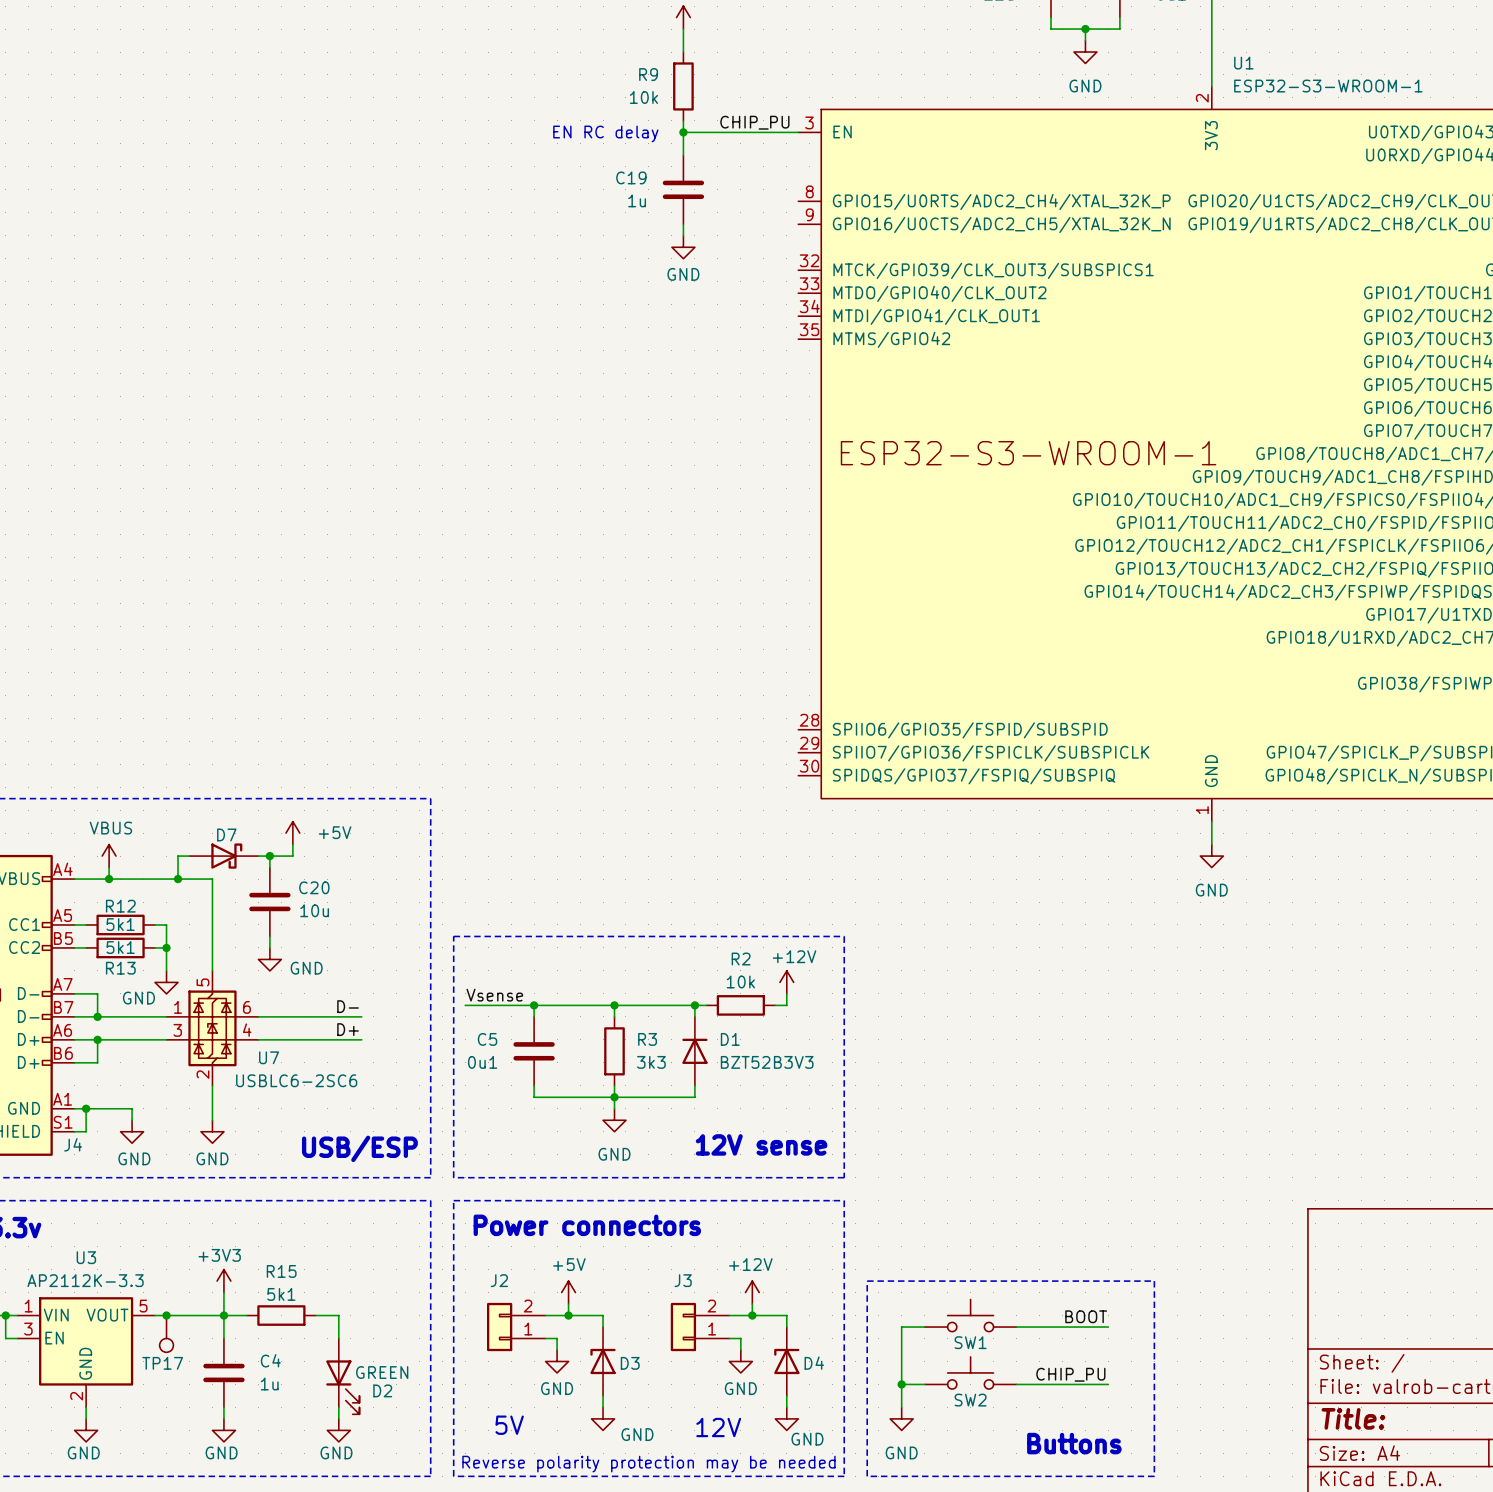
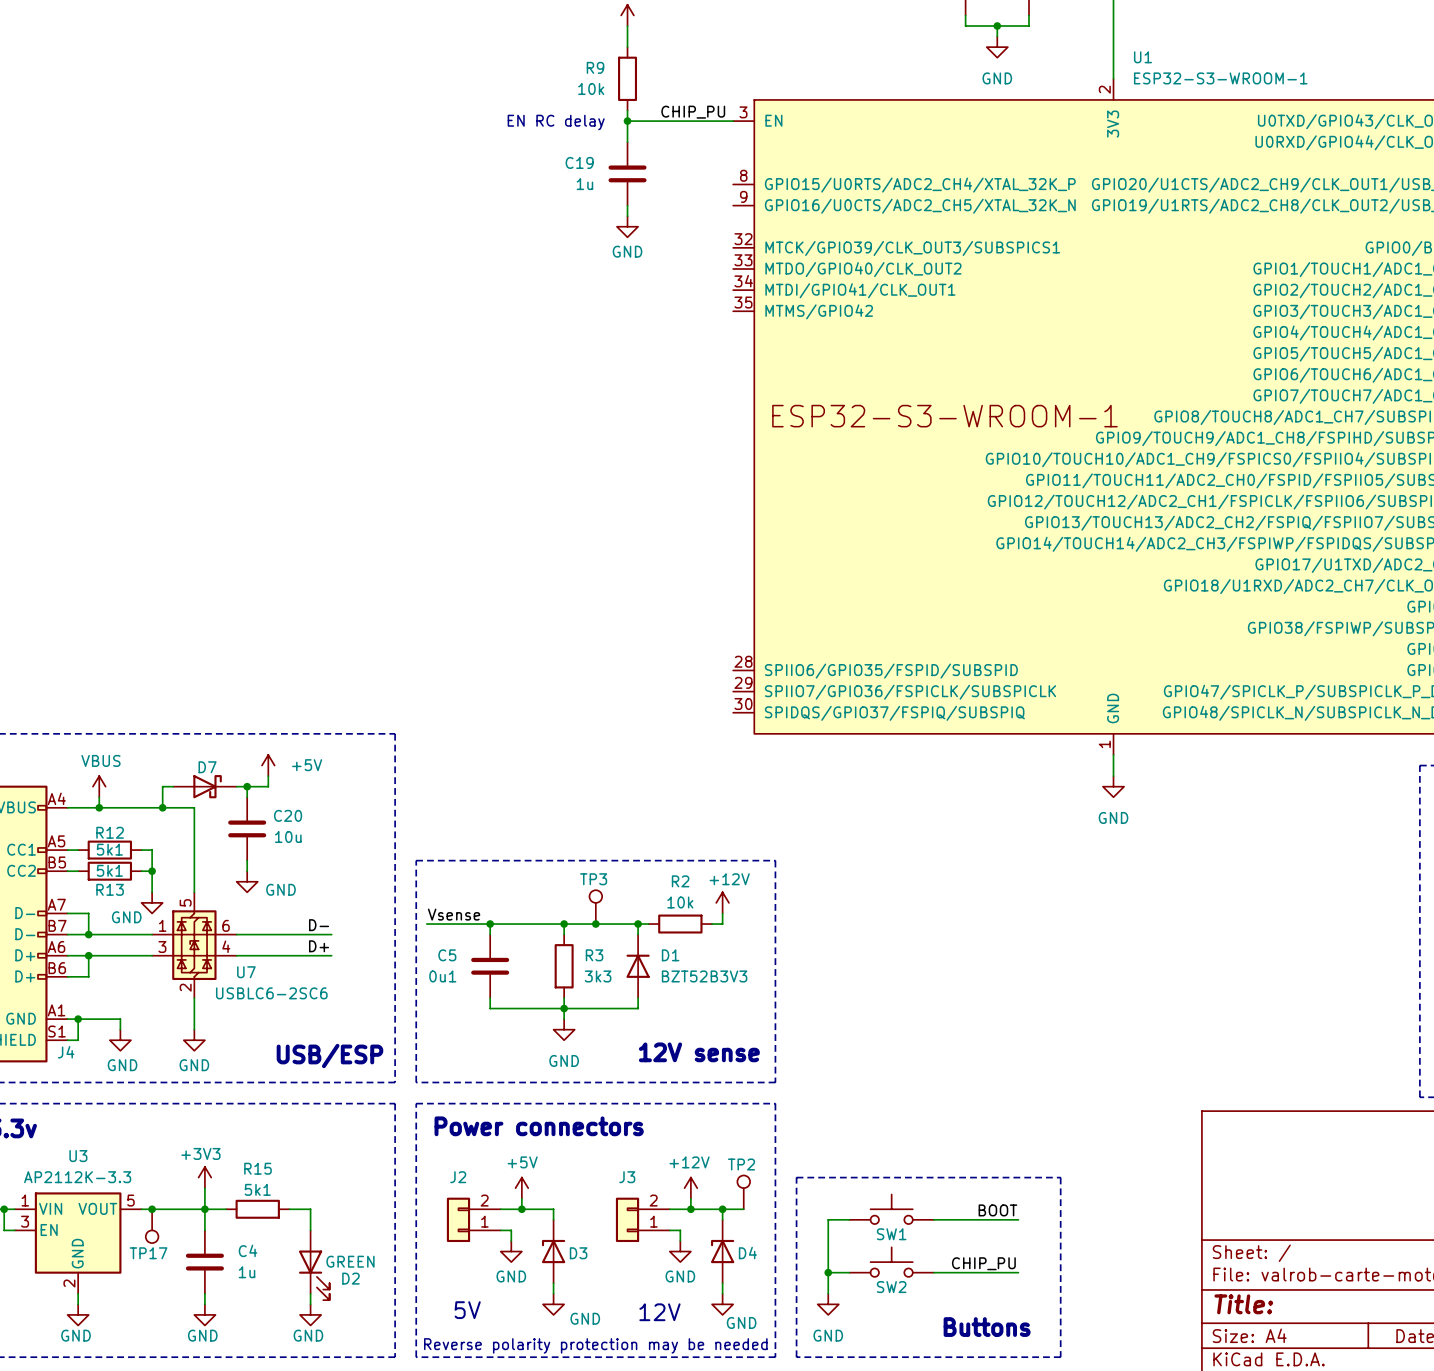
TP3: none -> (595, 907)
junction: none -> (595, 924)
TP2: none -> (743, 1192)
wire: none -> (722, 1209) (743, 1209)
junction: none -> (722, 1209)

